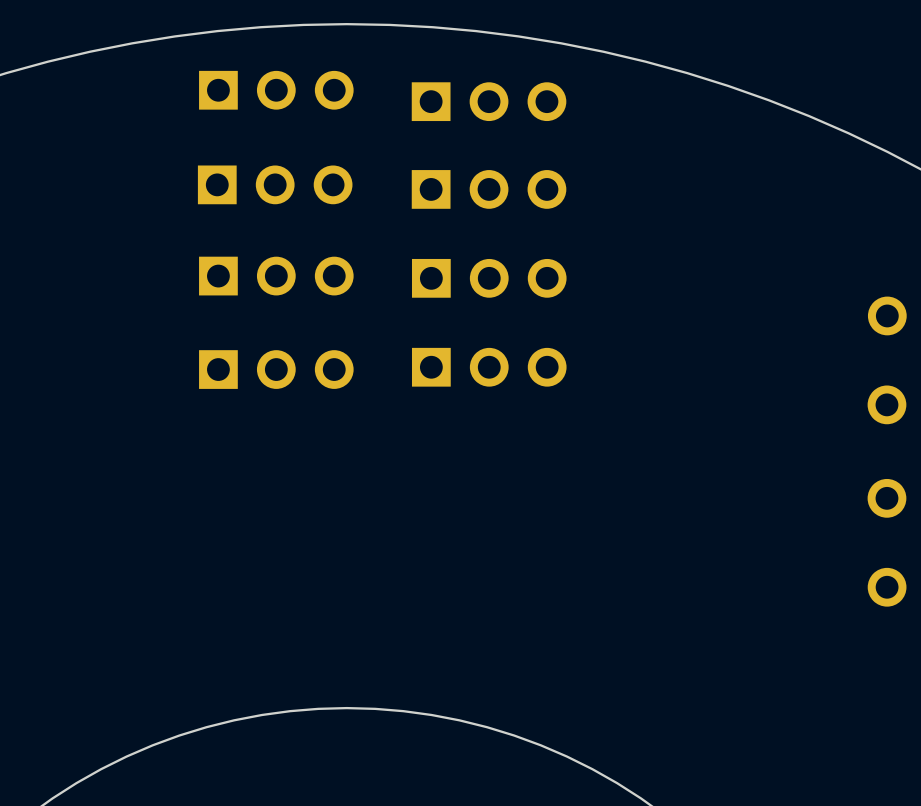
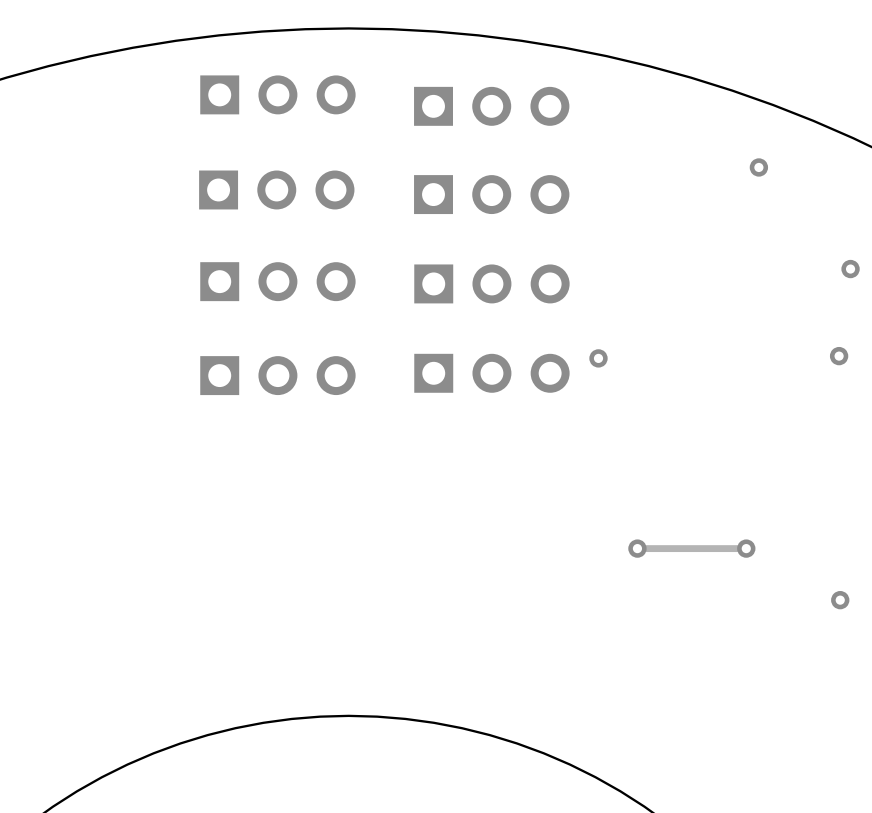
via: none -> (758, 167)
via: none -> (850, 269)
via: none -> (839, 356)
via: none -> (598, 358)
via: none -> (637, 548)
track: none -> (746, 548) (637, 548)
via: none -> (746, 548)
via: none -> (840, 600)

